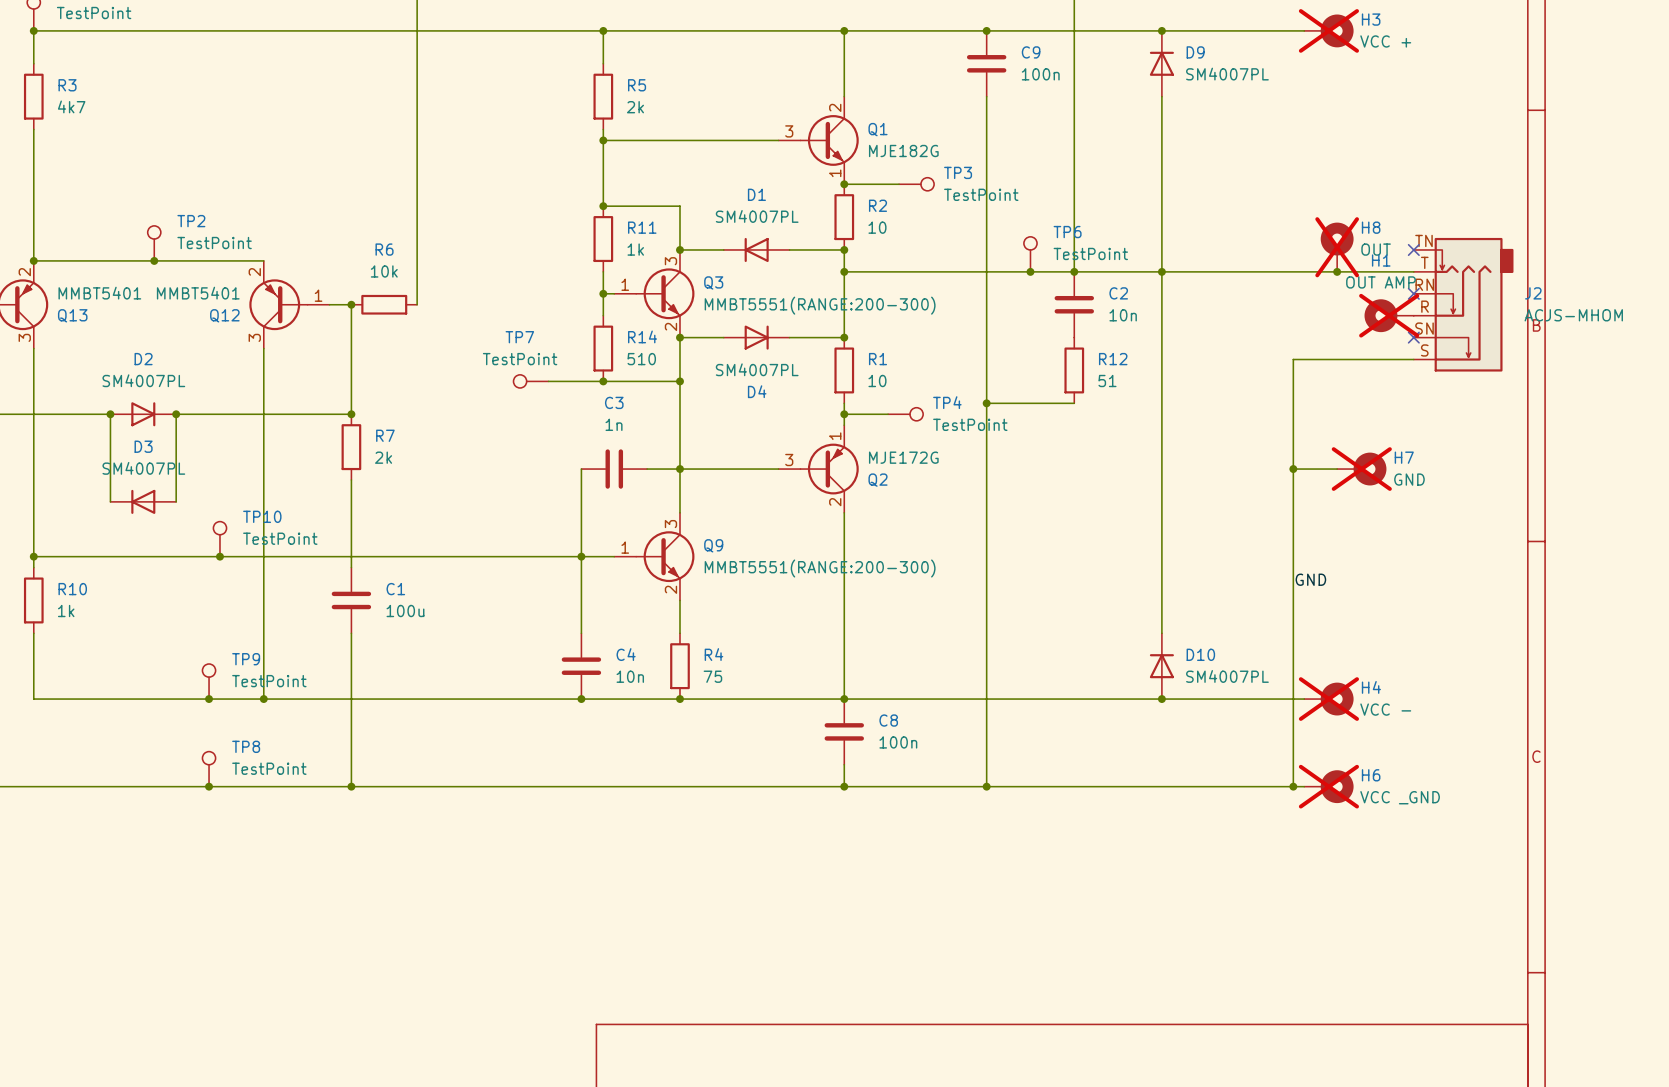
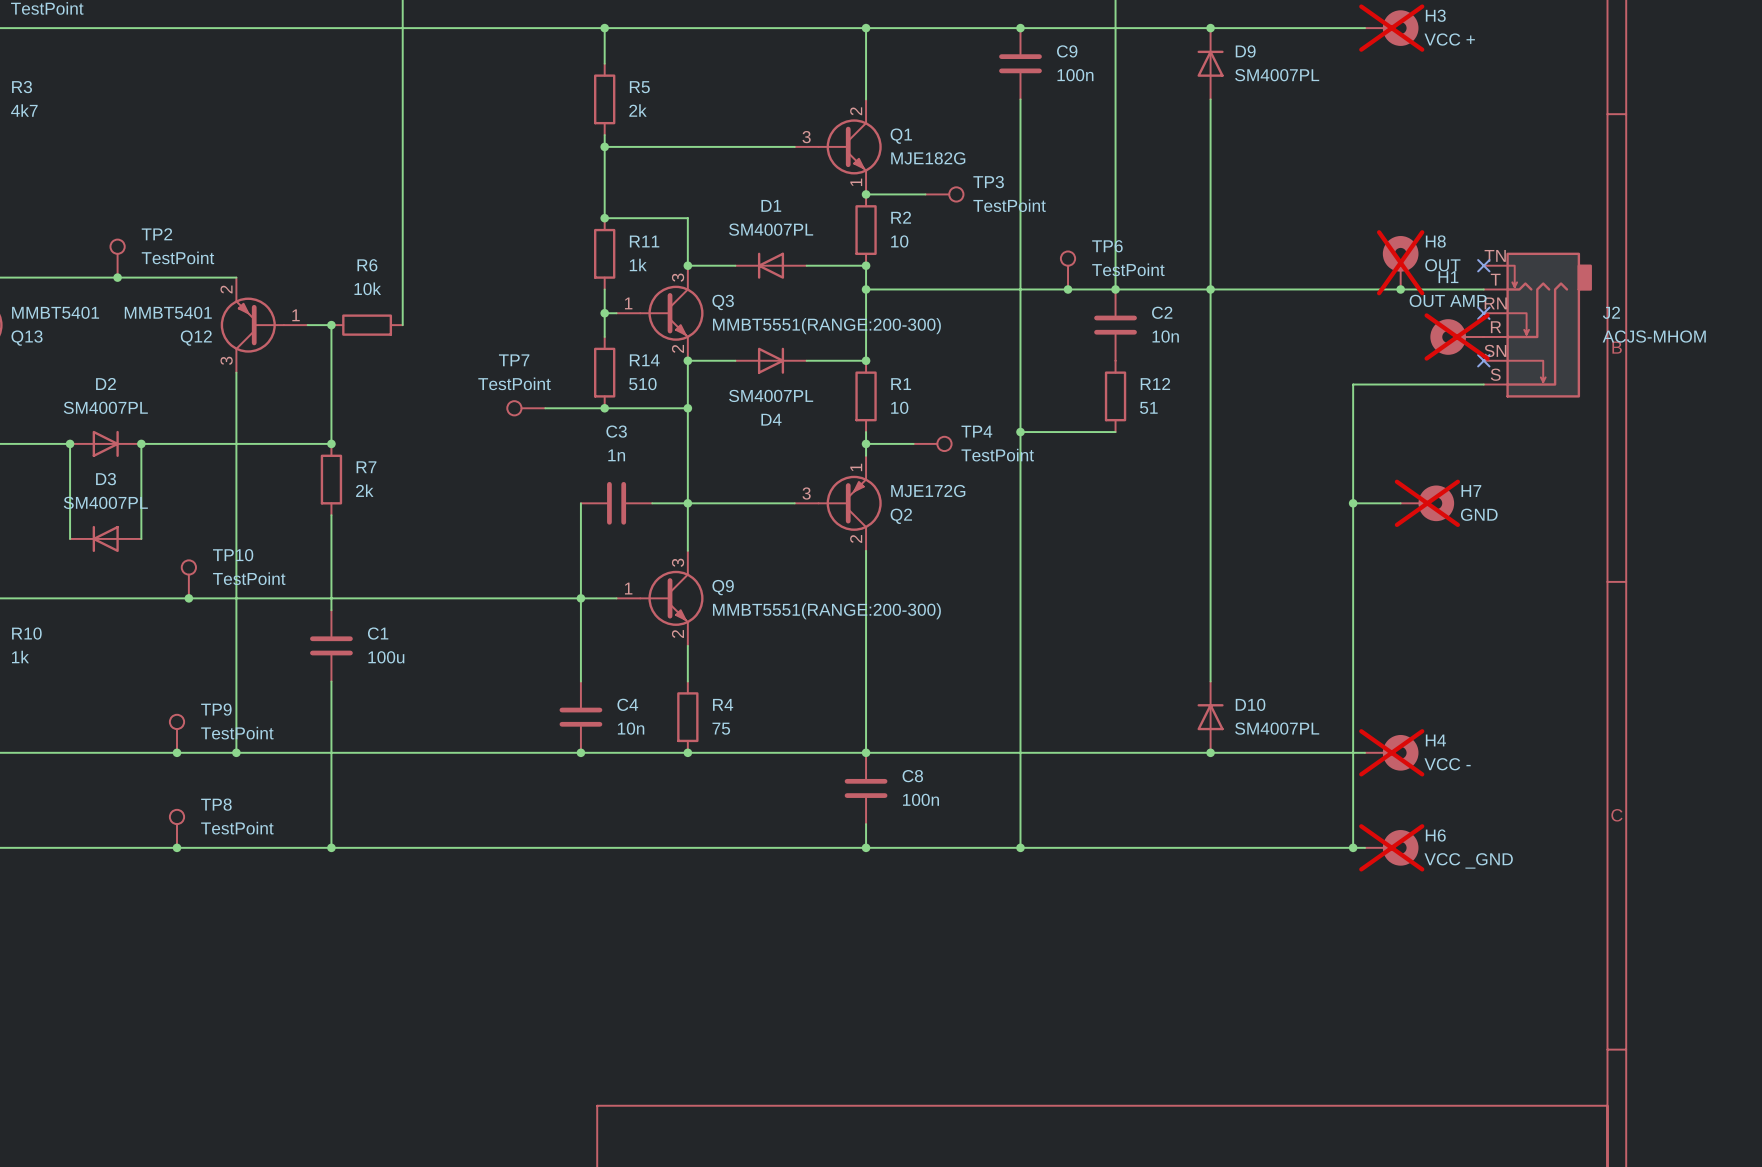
label: GND (1310, 579) -> none

